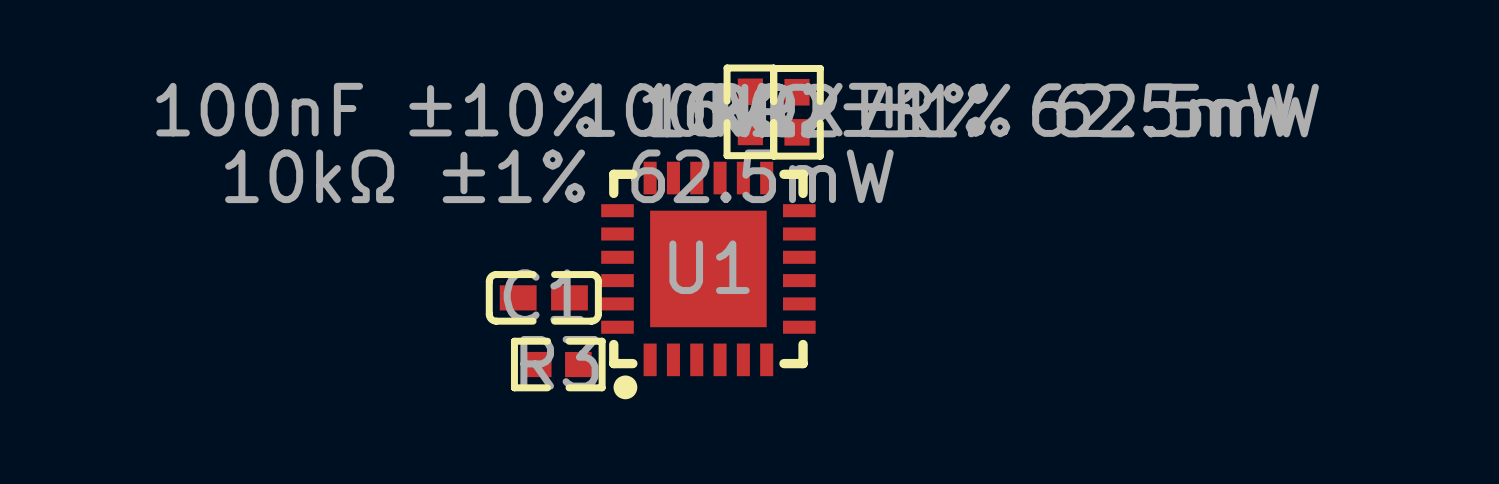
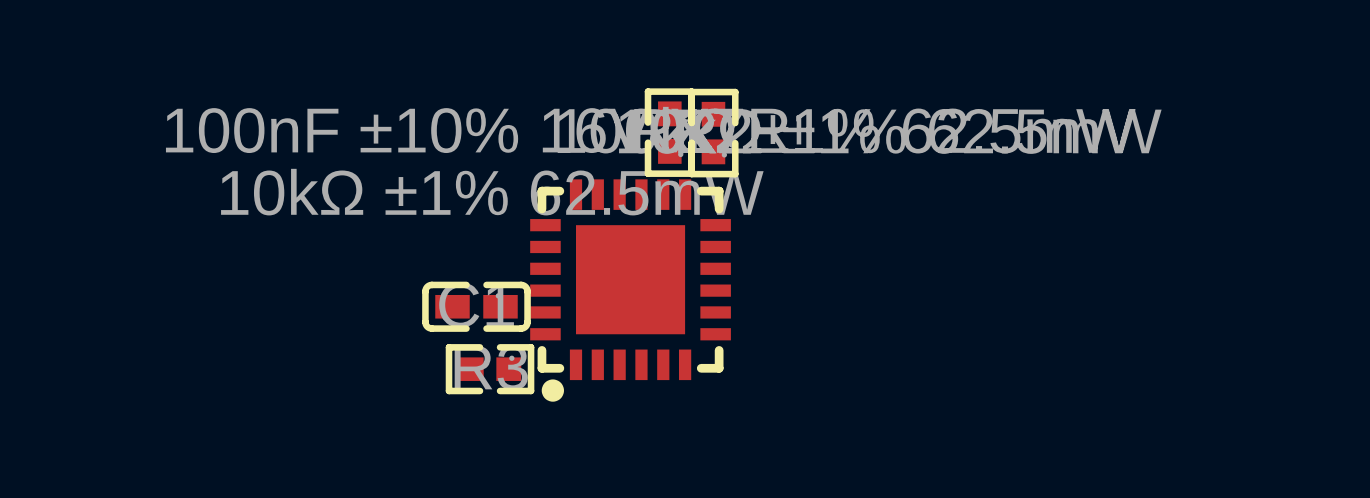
U1 name: U1 (709, 267) -> none

